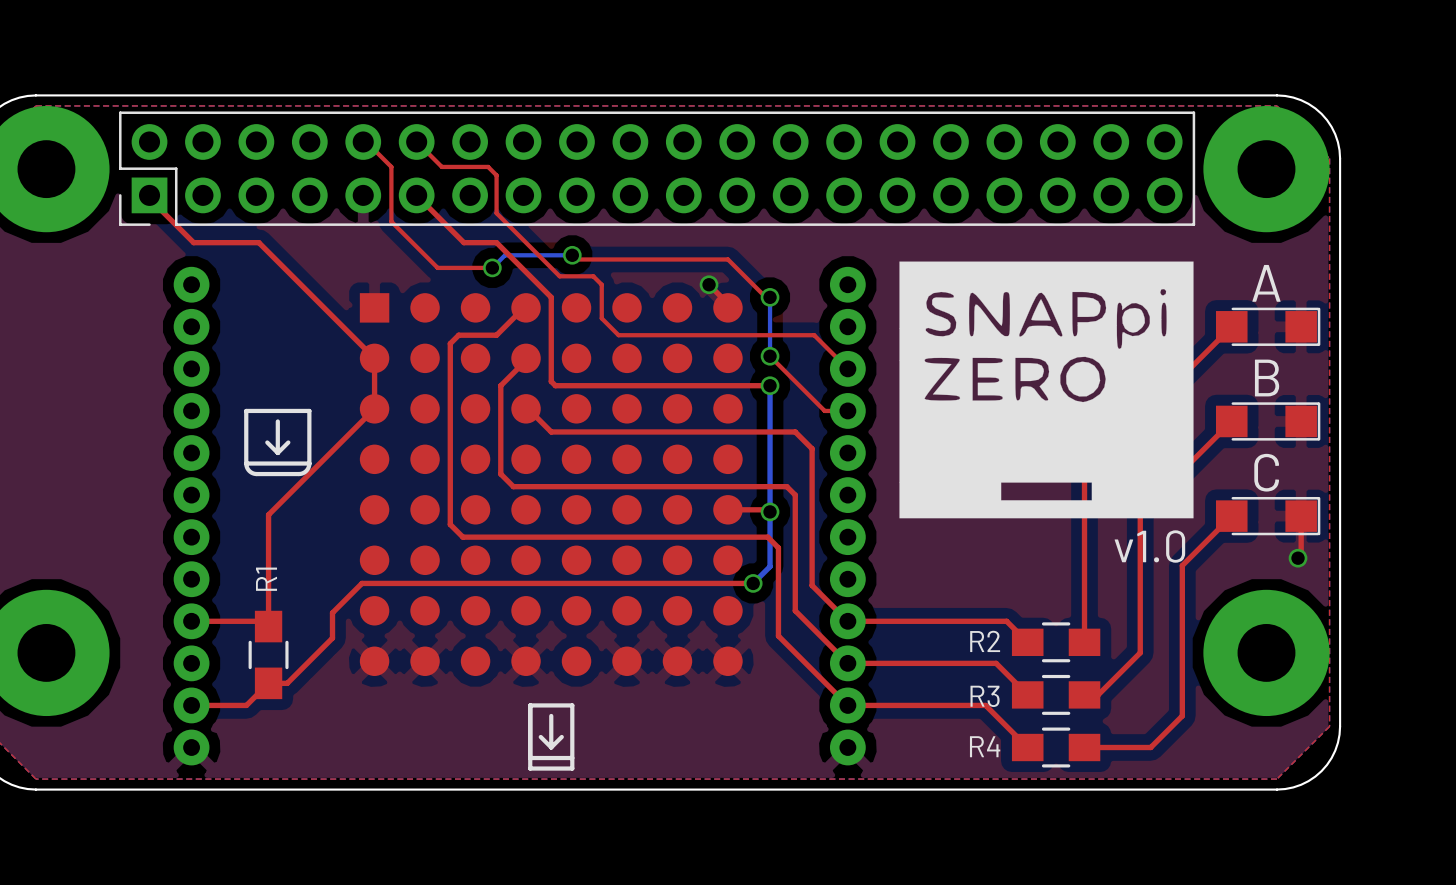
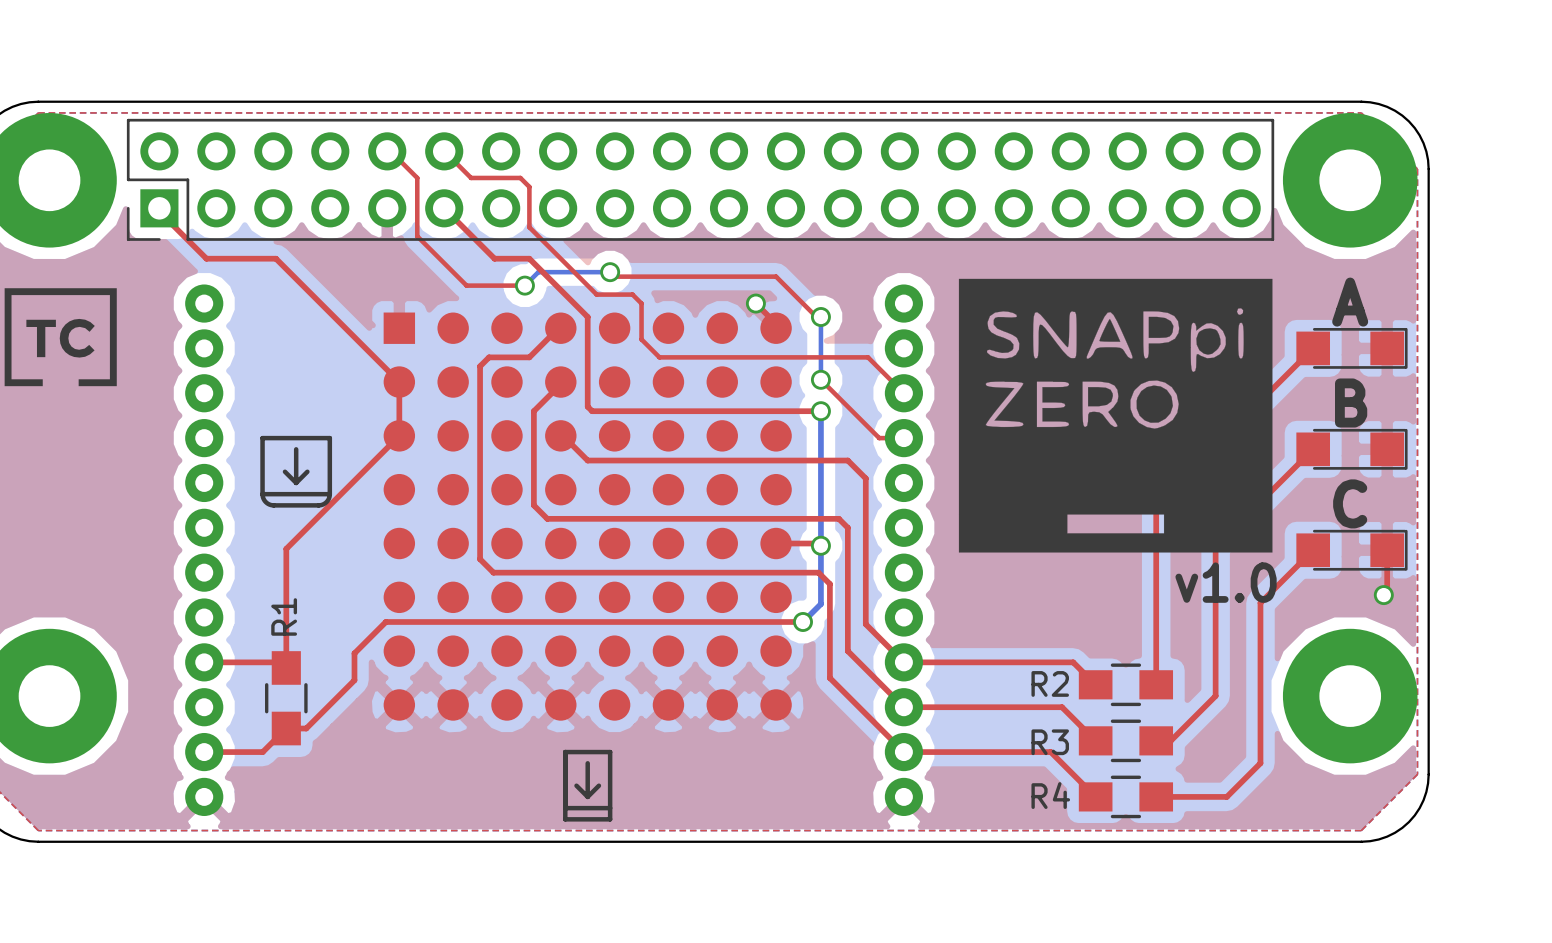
drawing: none -> [4, 288, 117, 387]

